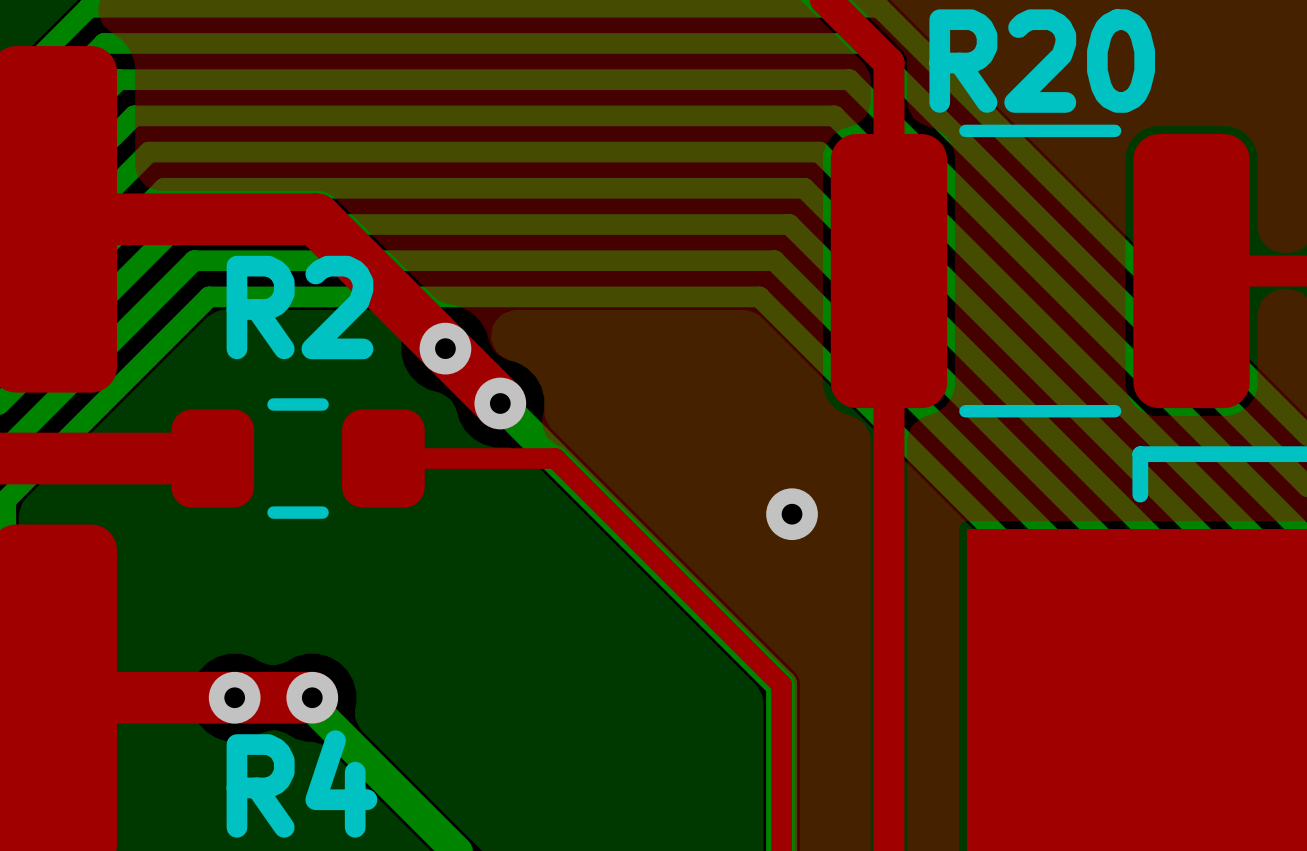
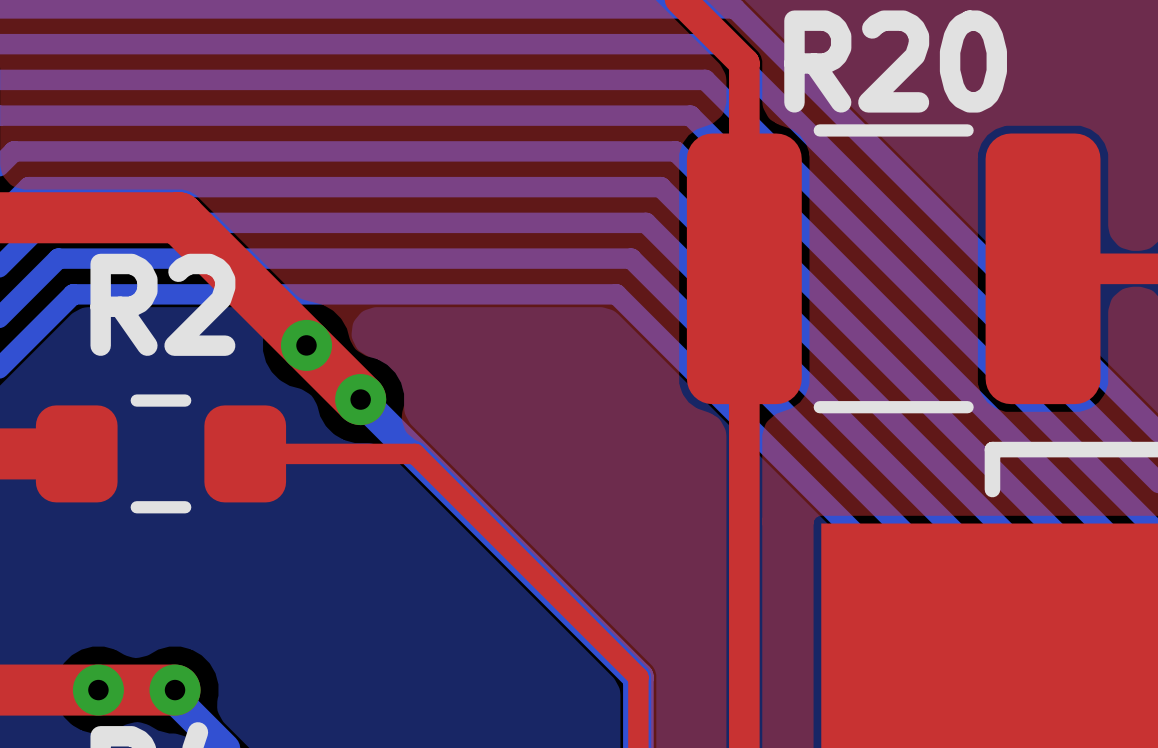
via: (792, 514) -> none

